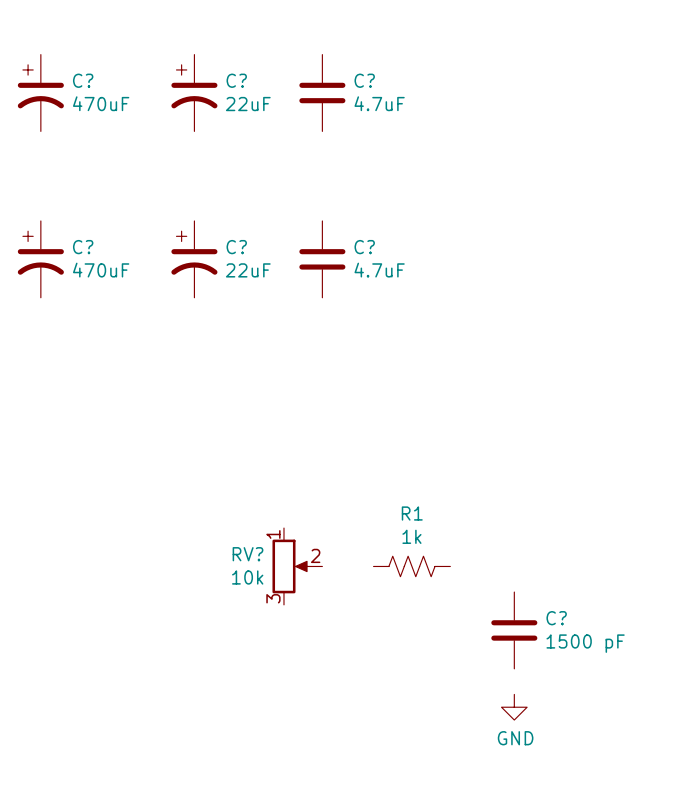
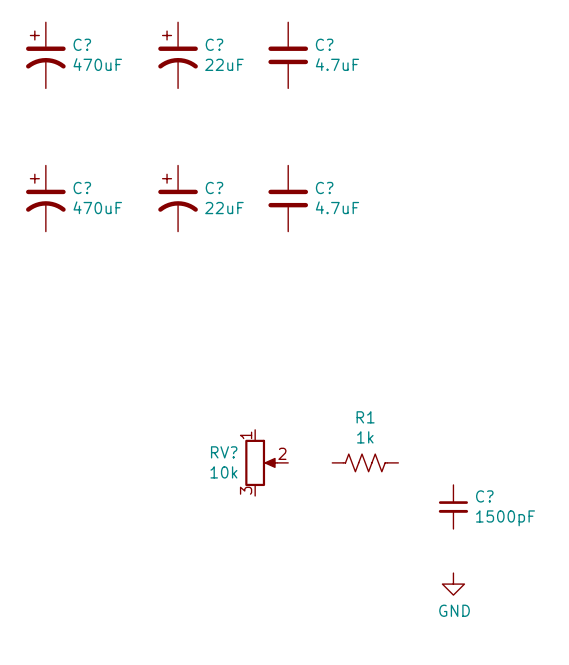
C?: none -> 1500pF (453, 506)
C?: 1500 pF (514, 630) -> none

